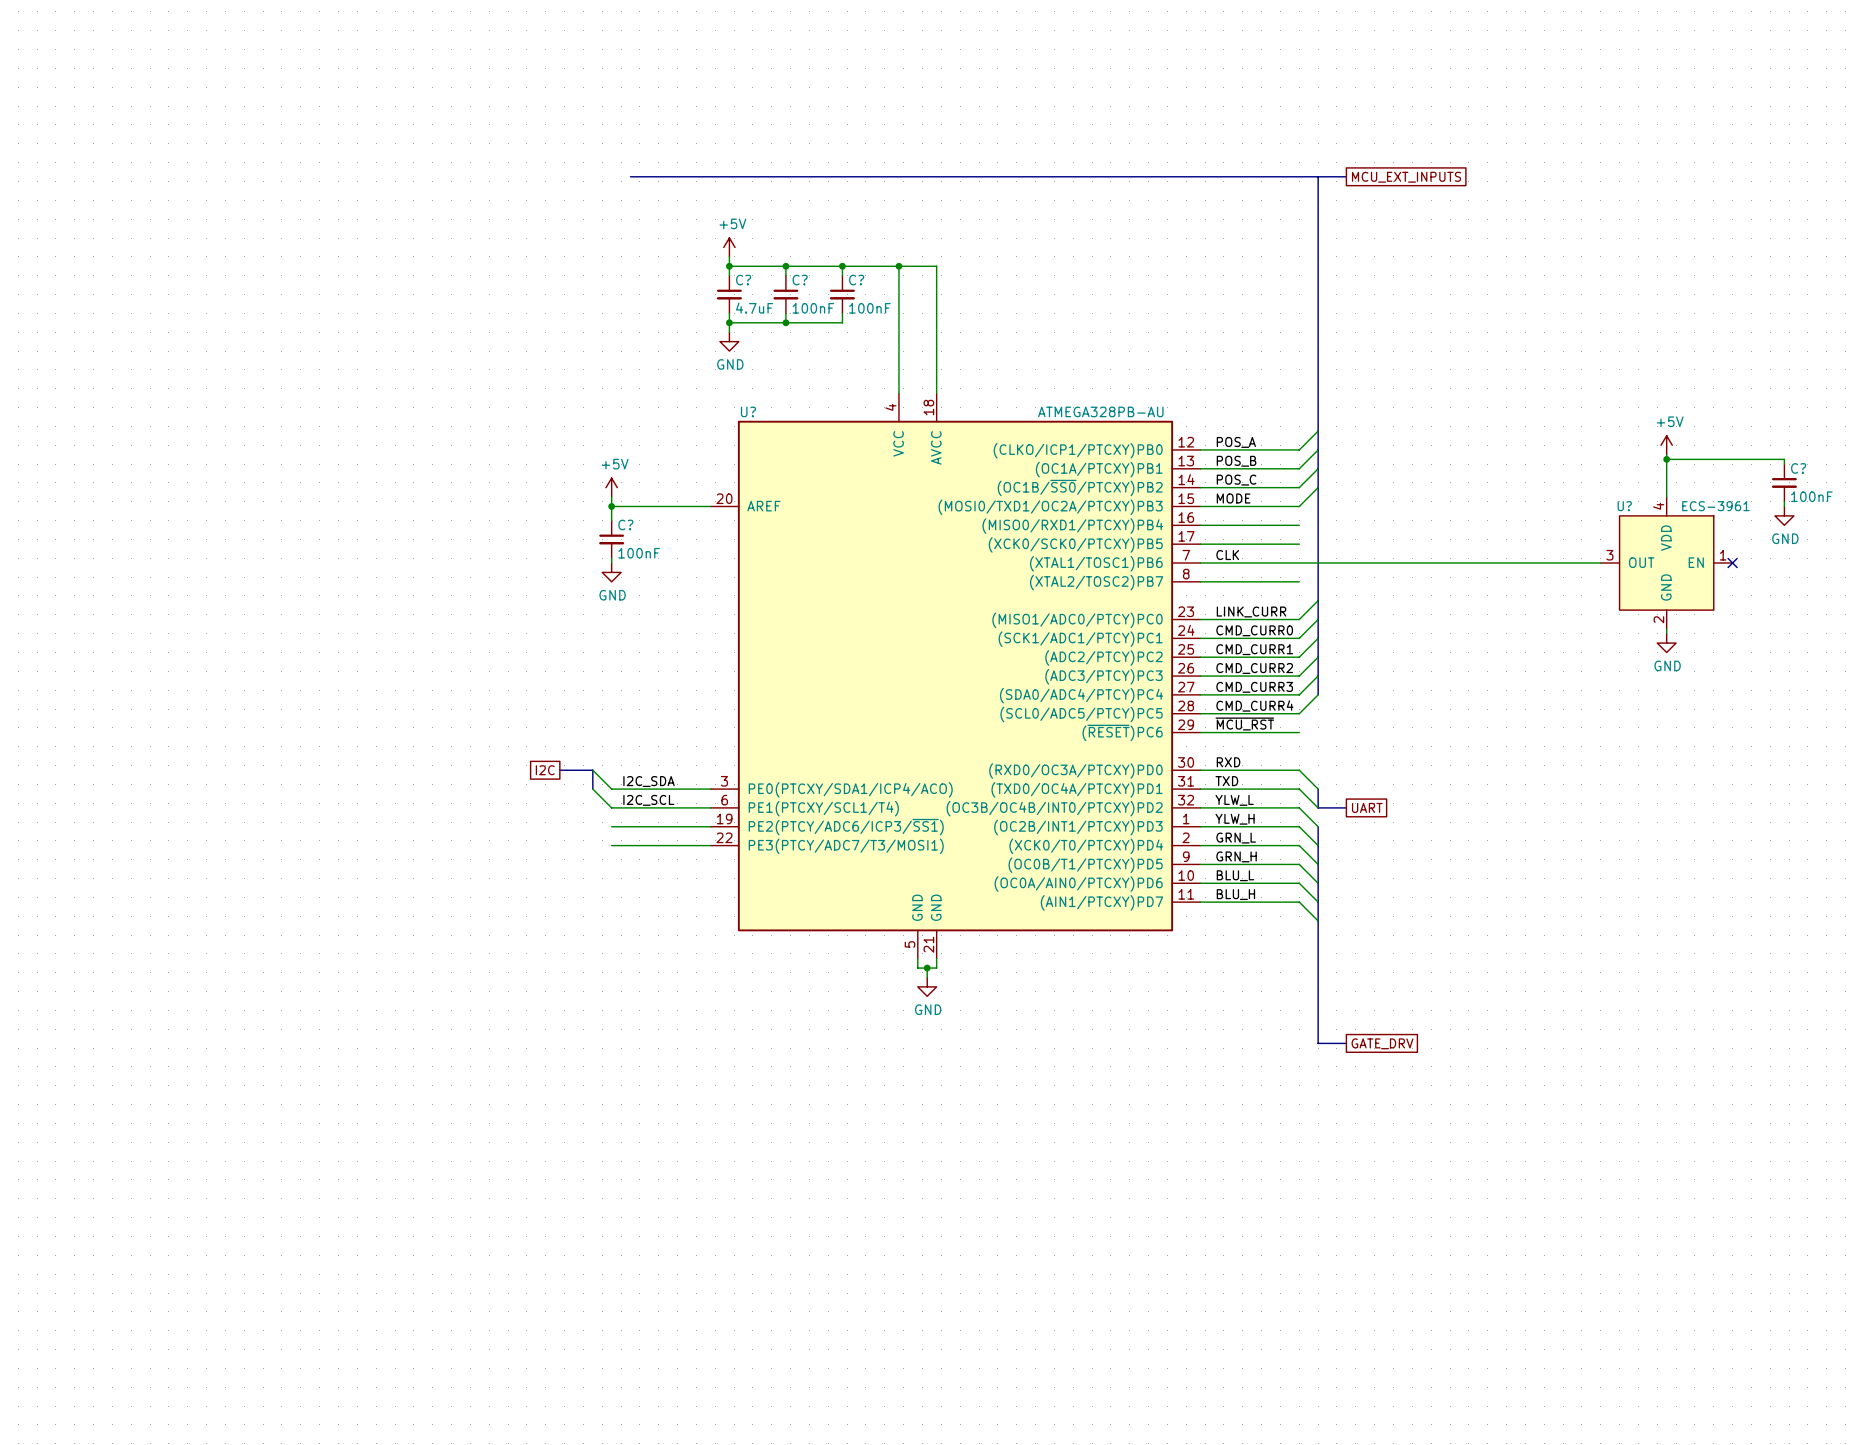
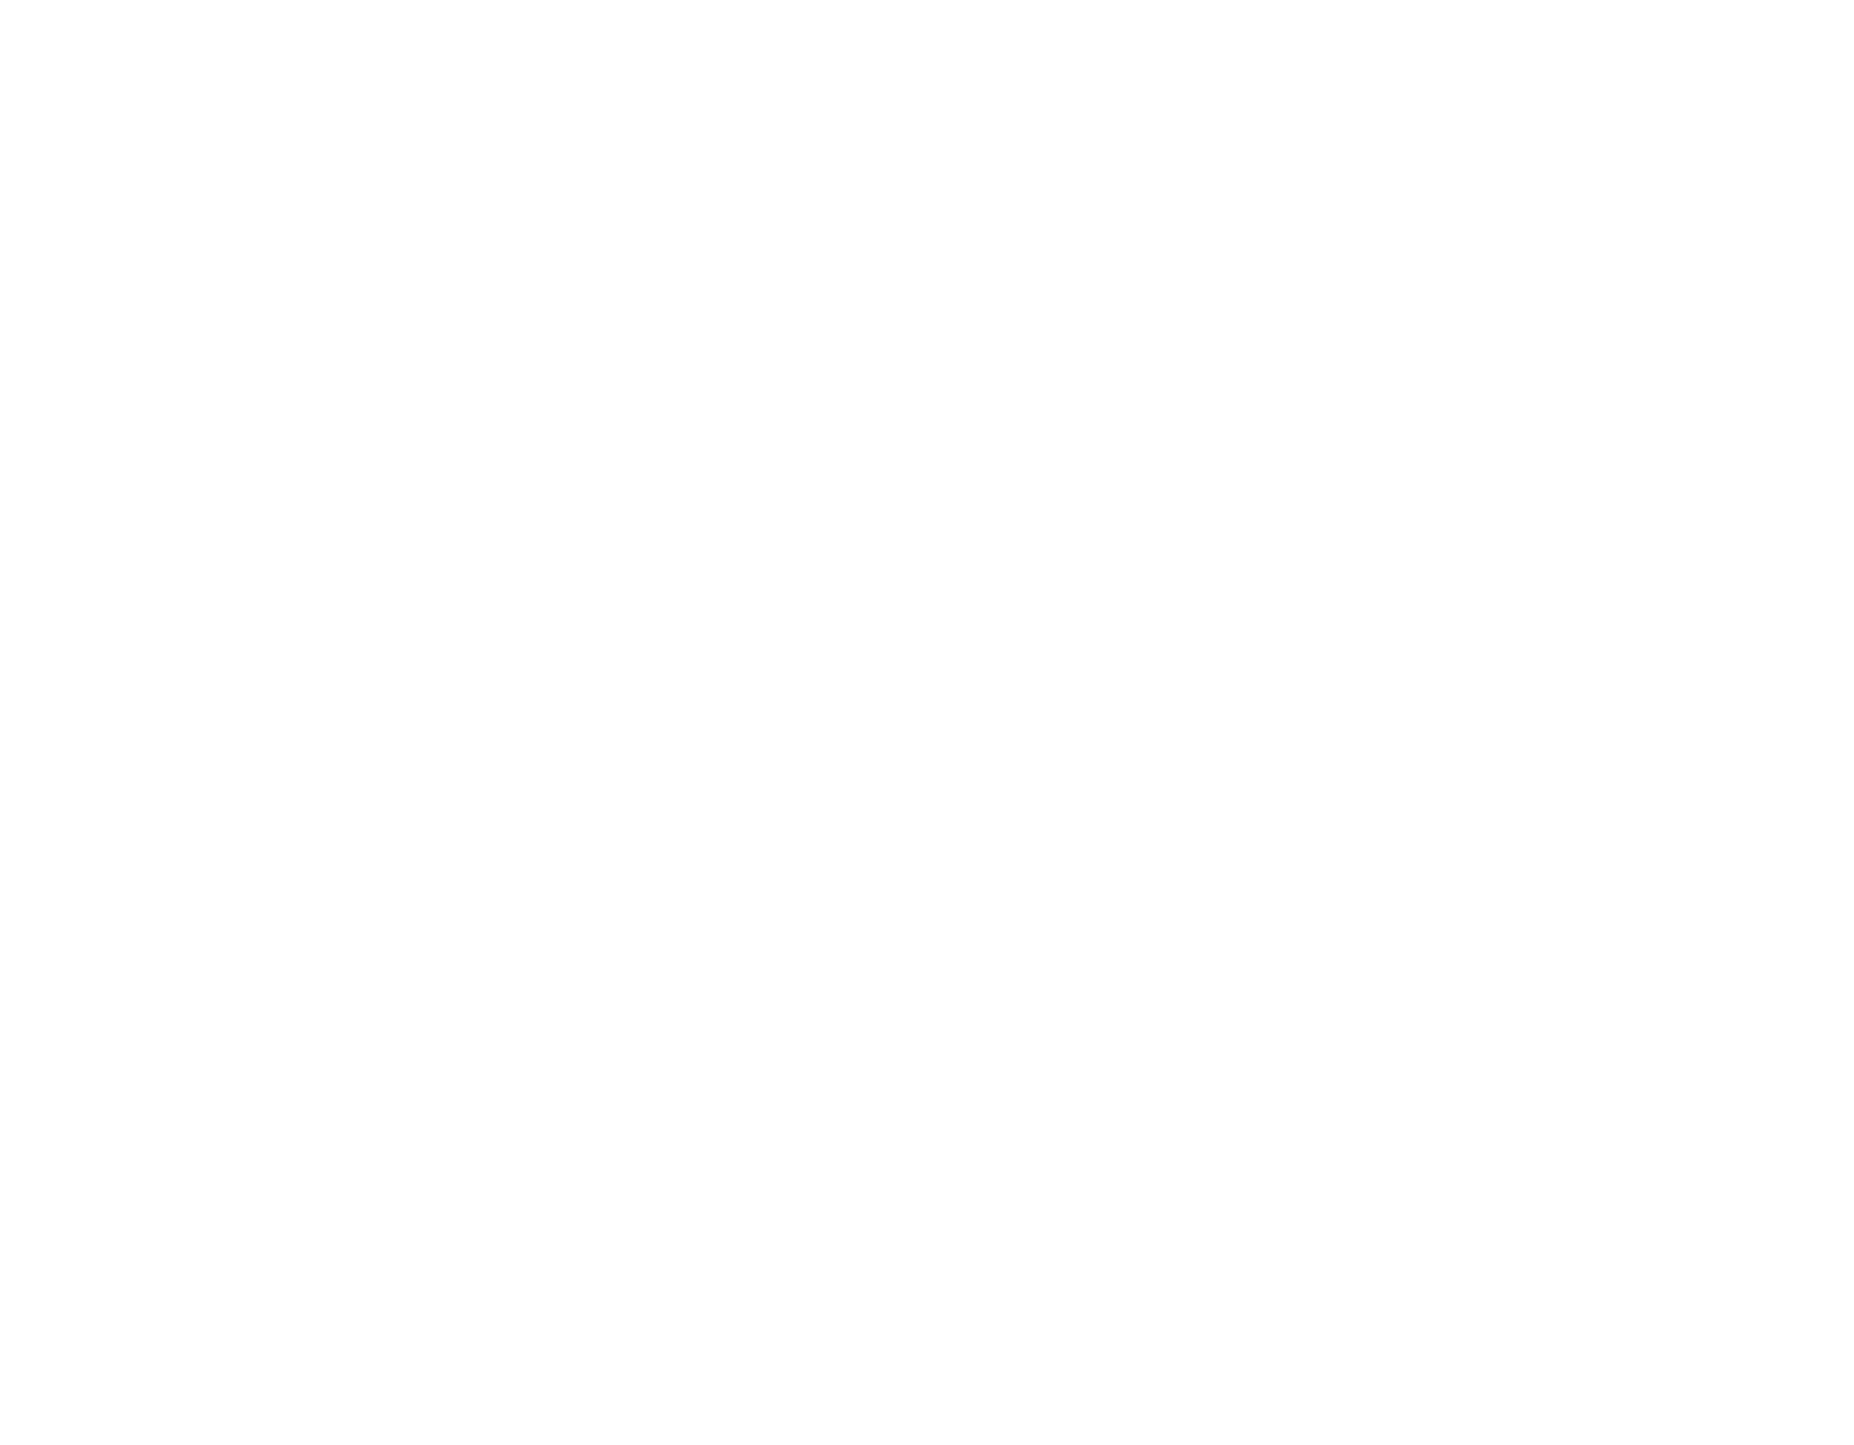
bus: (630, 176) (1346, 176) -> none
bus: (1318, 176) (1318, 694) -> none
global label: MCU_EXT_INPUTS (1406, 177) -> none
power symbol: +5V (729, 247) -> none
wire: (729, 256) (729, 275) -> none
wire: (729, 266) (936, 266) (936, 393) -> none
junction: (729, 266) -> none
wire: (785, 266) (785, 275) -> none
junction: (785, 266) -> none
wire: (842, 266) (842, 275) -> none
junction: (842, 266) -> none
wire: (898, 266) (898, 393) -> none
junction: (898, 266) -> none
C?: 4.7uF (729, 294) -> none
C?: 100nF (785, 294) -> none
C?: 100nF (842, 294) -> none
wire: (729, 313) (729, 332) -> none
wire: (785, 313) (785, 322) -> none
wire: (842, 313) (842, 322) (729, 322) -> none
junction: (729, 322) -> none
junction: (785, 322) -> none
power symbol: GND (729, 341) -> none
wire: (1318, 431) (1299, 449) (1200, 449) -> none
label: POS_A (1236, 442) -> none
power symbol: +5V (1666, 445) -> none
wire: (1318, 449) (1299, 468) (1200, 468) -> none
wire: (1666, 454) (1666, 497) -> none
wire: (1666, 459) (1784, 459) (1784, 464) -> none
junction: (1666, 459) -> none
label: POS_B (1236, 461) -> none
wire: (1318, 468) (1299, 487) (1200, 487) -> none
label: POS_C (1236, 480) -> none
C?: 100nF (1784, 482) -> none
power symbol: +5V (611, 487) -> none
wire: (1318, 487) (1299, 506) (1200, 506) -> none
wire: (611, 497) (611, 520) -> none
label: MODE (1233, 498) -> none
wire: (1784, 501) (1784, 506) -> none
wire: (611, 506) (710, 506) -> none
junction: (611, 506) -> none
power symbol: GND (1784, 515) -> none
wire: (1200, 525) (1299, 525) -> none
C?: 100nF (611, 539) -> none
wire: (1200, 544) (1299, 544) -> none
label: CLK (1227, 555) -> none
wire: (611, 558) (611, 563) -> none
wire: (1200, 563) (1600, 563) -> none
U?: ECS-3961 (1666, 563) -> none
no-connect mark: (1732, 563) -> none
power symbol: GND (611, 572) -> none
wire: (1200, 581) (1299, 581) -> none
wire: (1318, 600) (1299, 619) (1200, 619) -> none
label: LINK_CURR (1251, 611) -> none
wire: (1318, 619) (1299, 638) (1200, 638) -> none
wire: (1666, 628) (1666, 633) -> none
label: CMD_CURR0 (1254, 630) -> none
wire: (1318, 638) (1299, 657) (1200, 657) -> none
power symbol: GND (1666, 643) -> none
label: CMD_CURR1 (1254, 649) -> none
wire: (1318, 657) (1299, 676) (1200, 676) -> none
label: CMD_CURR2 (1254, 668) -> none
U?: ATMEGA328PB-AU (955, 676) -> none
wire: (1318, 676) (1299, 694) (1200, 694) -> none
label: CMD_CURR3 (1254, 687) -> none
wire: (1318, 694) (1299, 713) (1200, 713) -> none
label: CMD_CURR4 (1254, 705) -> none
label: ~{MCU_RST} (1244, 723) -> none
wire: (1200, 732) (1299, 732) -> none
label: RXD (1228, 762) -> none
global label: I2C (545, 770) -> none
bus: (559, 770) (592, 770) (592, 789) -> none
wire: (592, 770) (611, 789) (710, 789) -> none
wire: (1200, 770) (1299, 770) (1318, 789) -> none
label: I2C_SDA (649, 781) -> none
label: TXD (1226, 781) -> none
wire: (592, 789) (611, 807) (710, 807) -> none
wire: (1200, 789) (1299, 789) (1318, 807) -> none
bus: (1318, 789) (1318, 807) (1346, 807) -> none
label: I2C_SCL (648, 800) -> none
label: YLW_L (1234, 800) -> none
wire: (1200, 807) (1299, 807) (1318, 826) -> none
global label: UART (1367, 807) -> none
label: YLW_H (1235, 819) -> none
wire: (611, 826) (710, 826) -> none
wire: (1200, 826) (1299, 826) (1318, 845) -> none
bus: (1318, 826) (1318, 1043) (1346, 1043) -> none
label: GRN_L (1236, 838) -> none
wire: (611, 845) (710, 845) -> none
wire: (1200, 845) (1299, 845) (1318, 864) -> none
label: GRN_H (1236, 856) -> none
wire: (1200, 864) (1299, 864) (1318, 883) -> none
label: BLU_L (1235, 875) -> none
wire: (1200, 883) (1299, 883) (1318, 902) -> none
label: BLU_H (1235, 894) -> none
wire: (1200, 902) (1299, 902) (1318, 920) -> none
wire: (917, 958) (917, 968) (936, 968) (936, 958) -> none
wire: (927, 968) (927, 977) -> none
junction: (927, 968) -> none
power symbol: GND (927, 986) -> none
global label: GATE_DRV (1382, 1043) -> none

